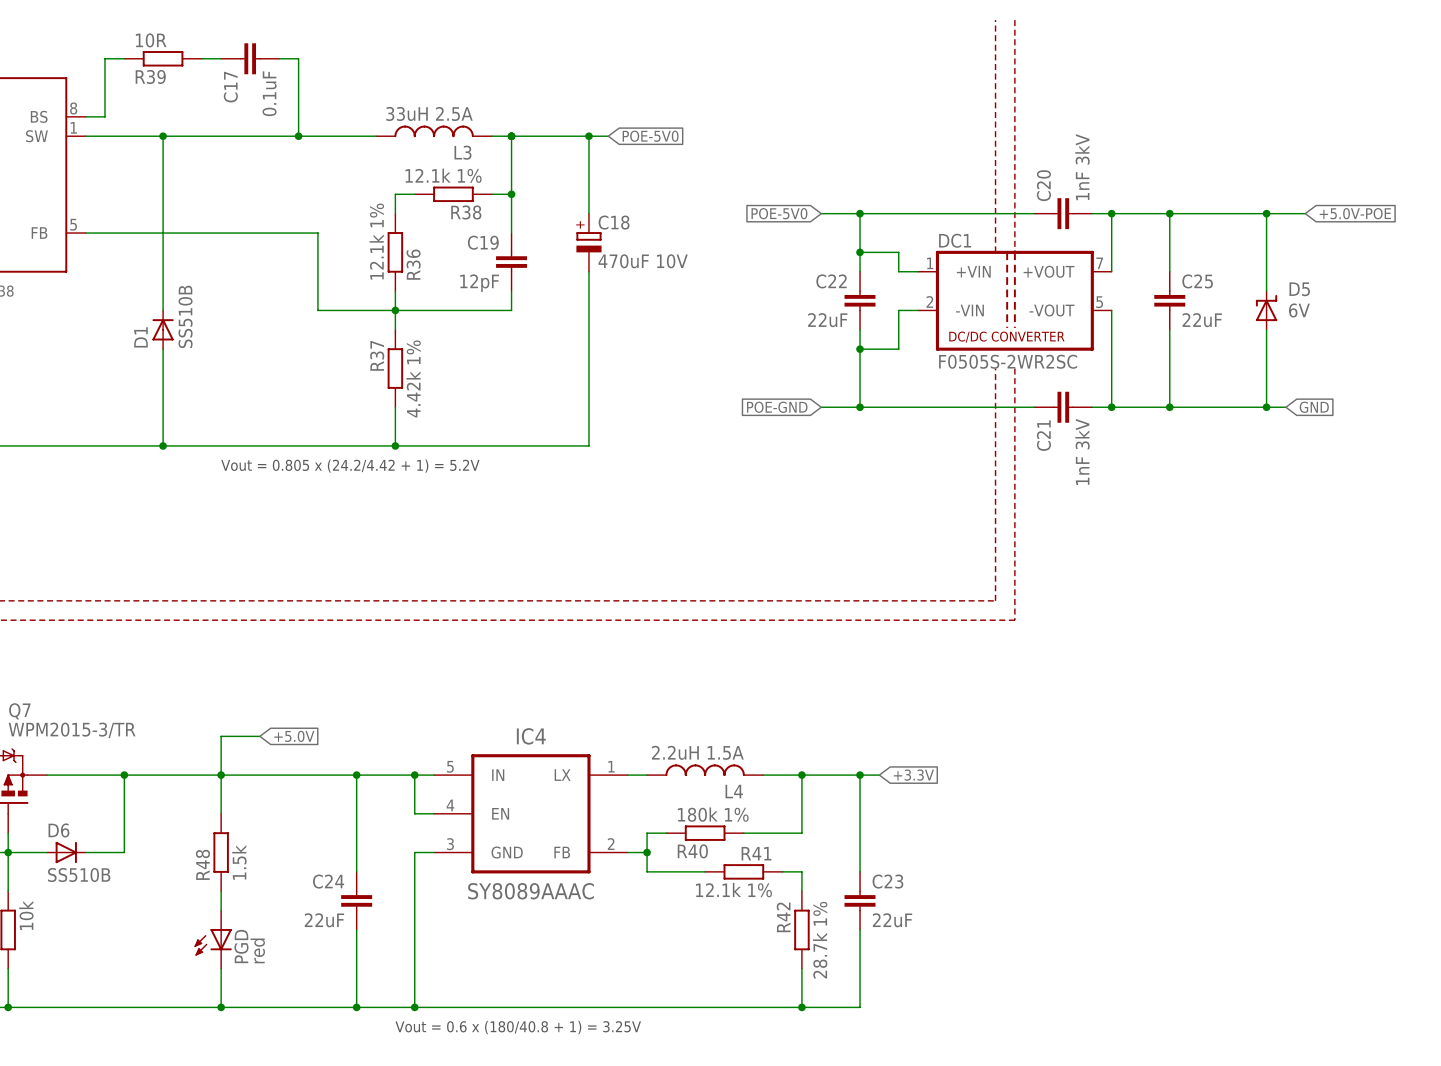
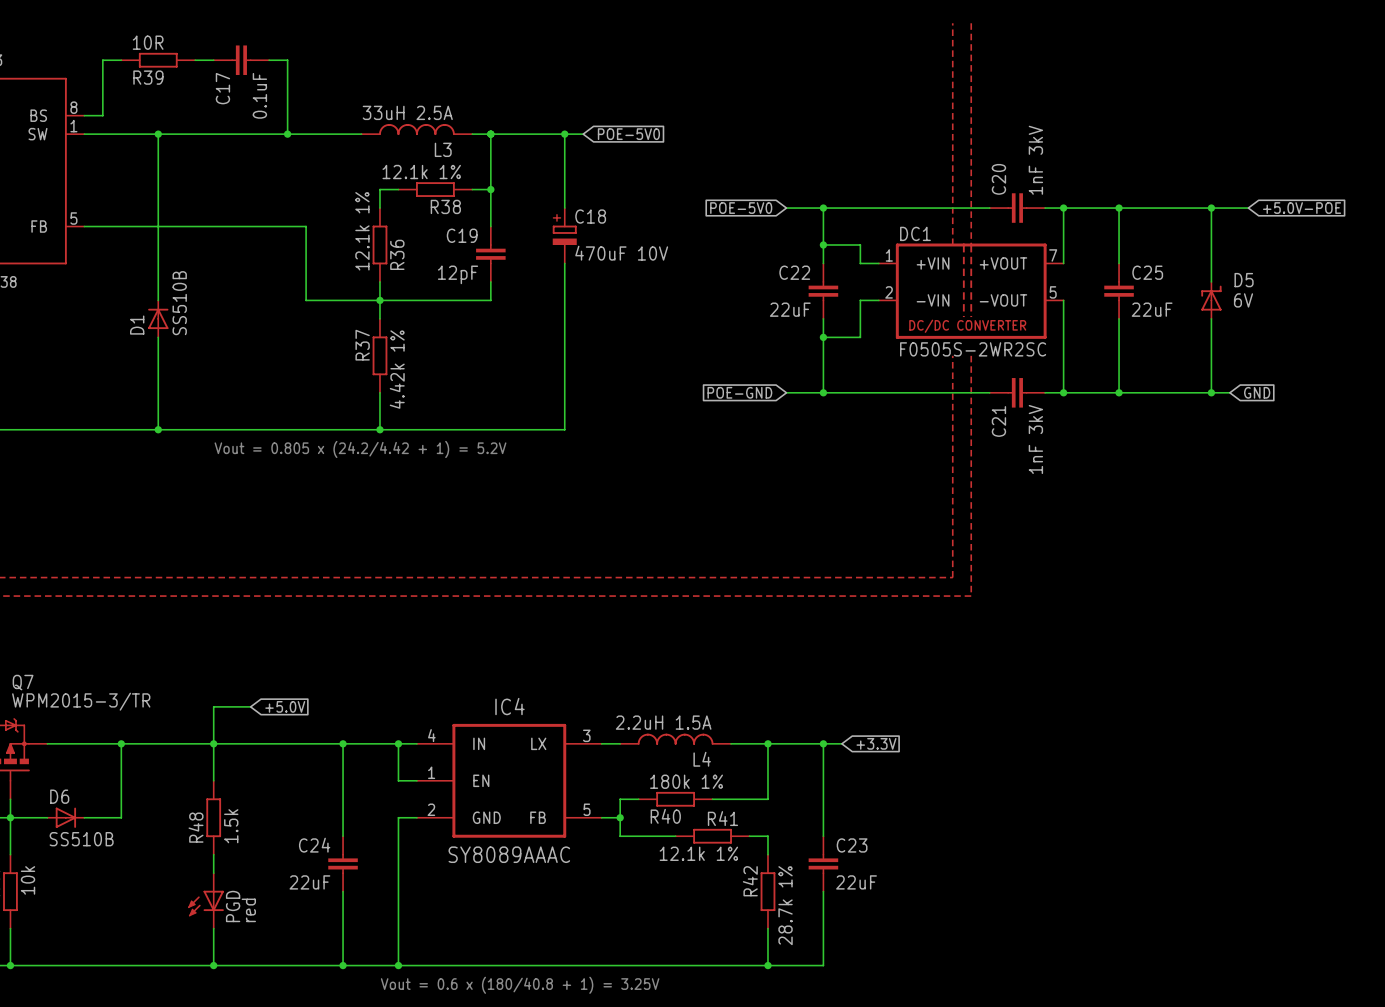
IC4 pin number: 5 (450, 766) -> 4 (431, 735)
IC4 pin number: 1 (611, 766) -> 3 (586, 735)
IC4 pin number: 4 (450, 805) -> 1 (431, 772)
IC4 pin number: 3 (450, 844) -> 2 (431, 809)
IC4 pin number: 2 (611, 844) -> 5 (587, 809)

